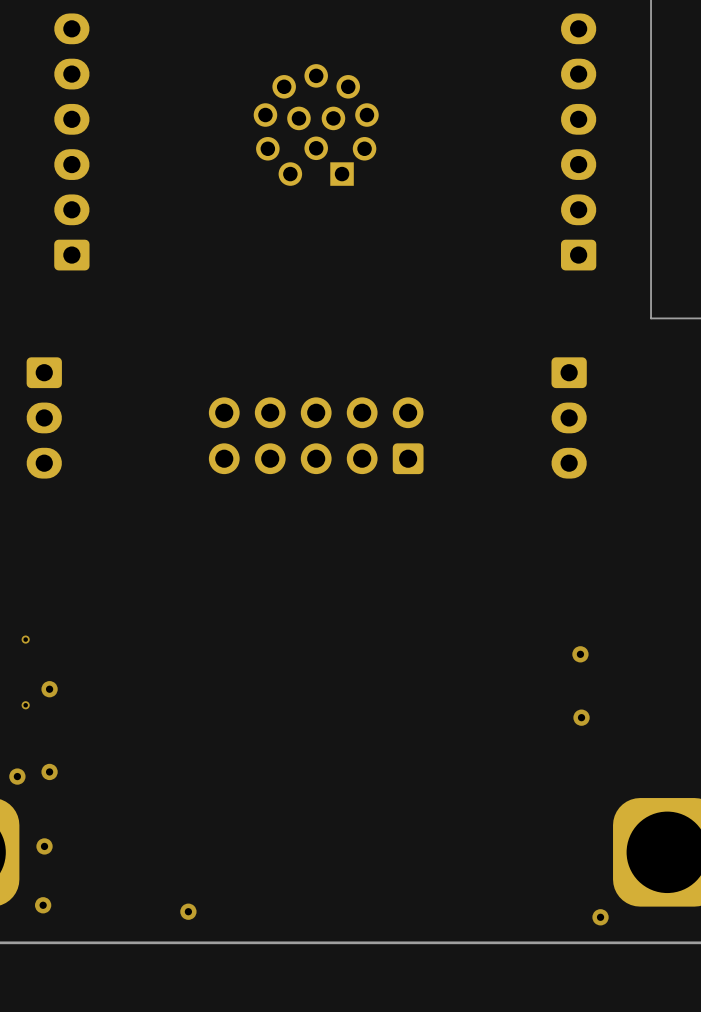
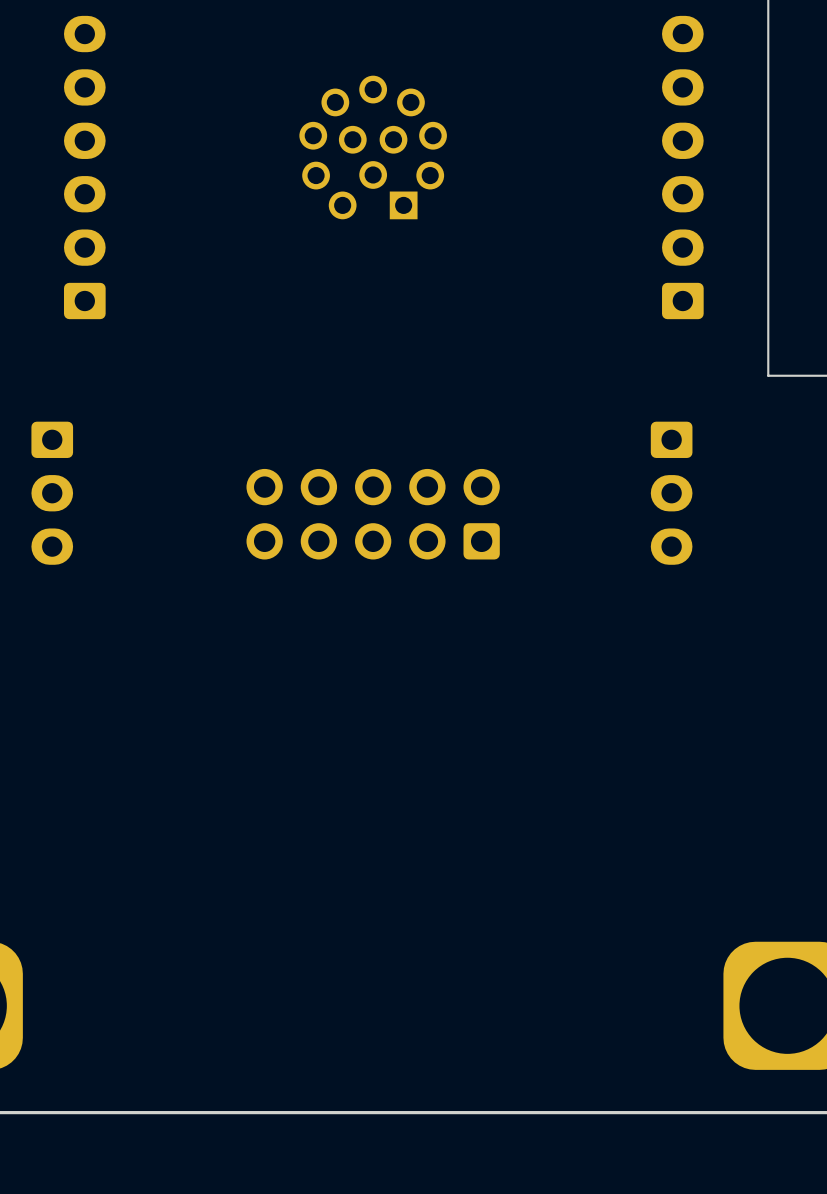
via: (25, 639) -> none
via: (580, 654) -> none
via: (49, 689) -> none
via: (25, 705) -> none
via: (581, 717) -> none
via: (49, 771) -> none
via: (17, 776) -> none
via: (44, 846) -> none
via: (43, 905) -> none
via: (188, 911) -> none
via: (600, 917) -> none

